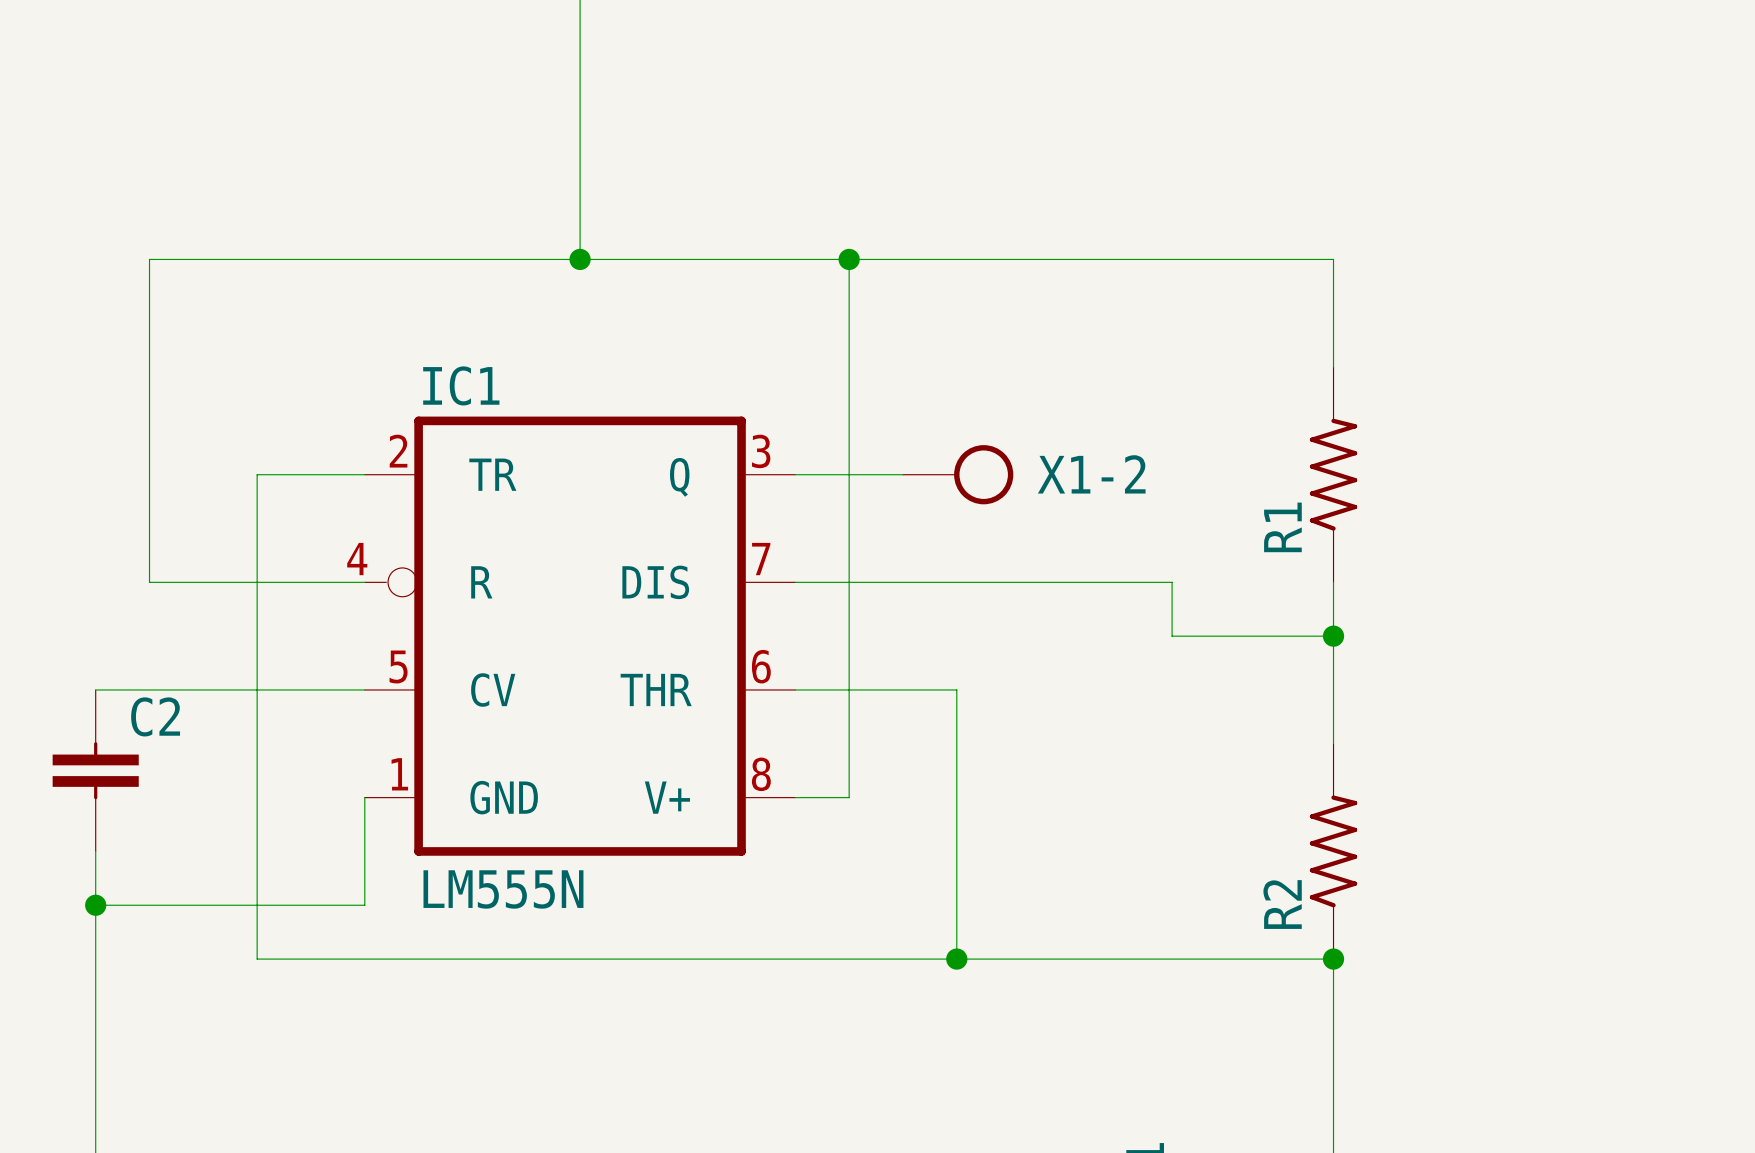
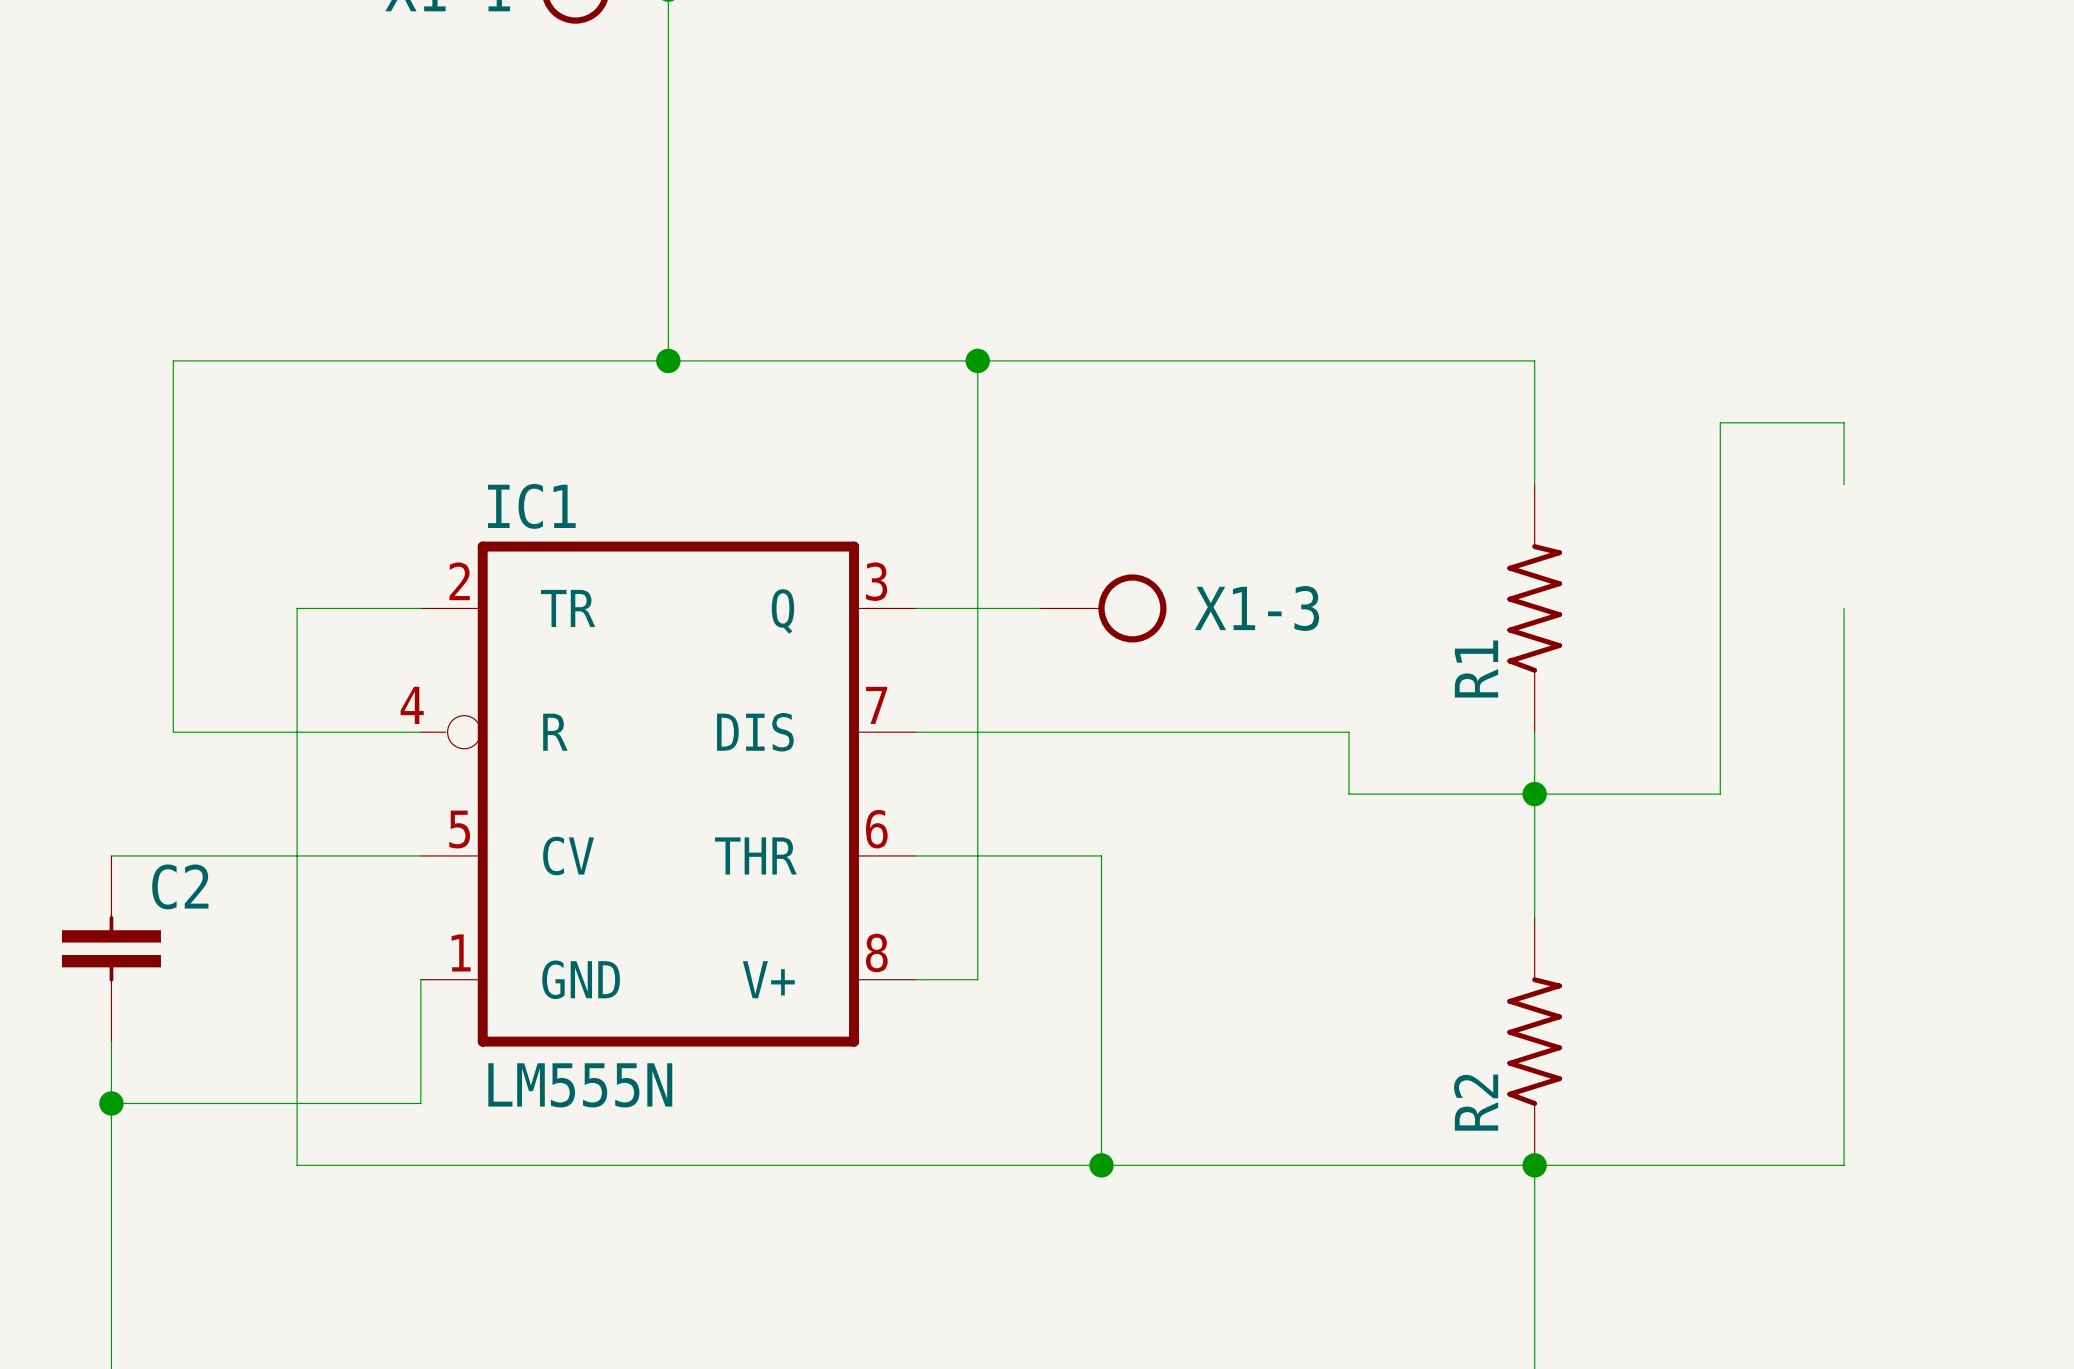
wire: none -> (1844, 484) (1844, 422) (1720, 422) (1720, 794) (1534, 794)
X1-2 name: X1-2 (1091, 474) -> X1-3 (1256, 608)
wire: none -> (1844, 608) (1844, 1165) (1534, 1165)

